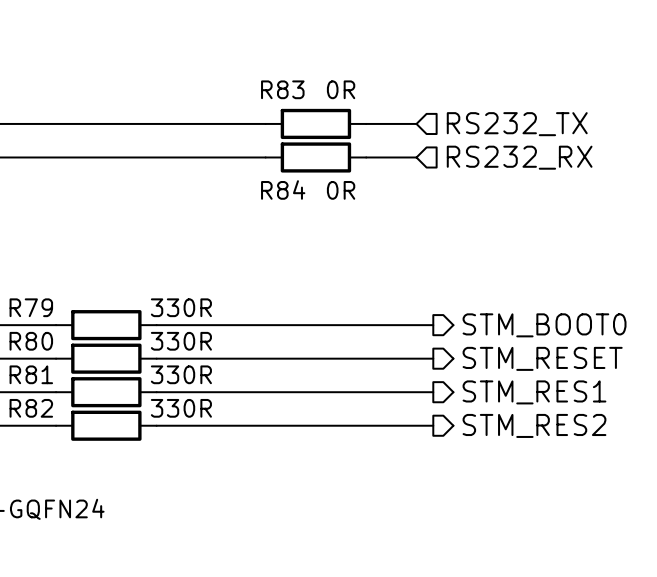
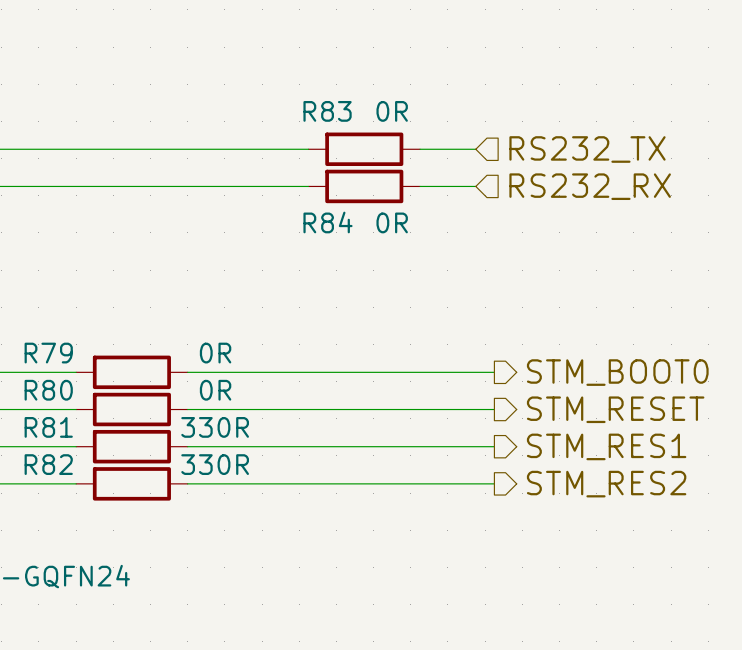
R79 value: 330R (181, 307) -> 0R (215, 353)
R80 value: 330R (181, 341) -> 0R (215, 390)

